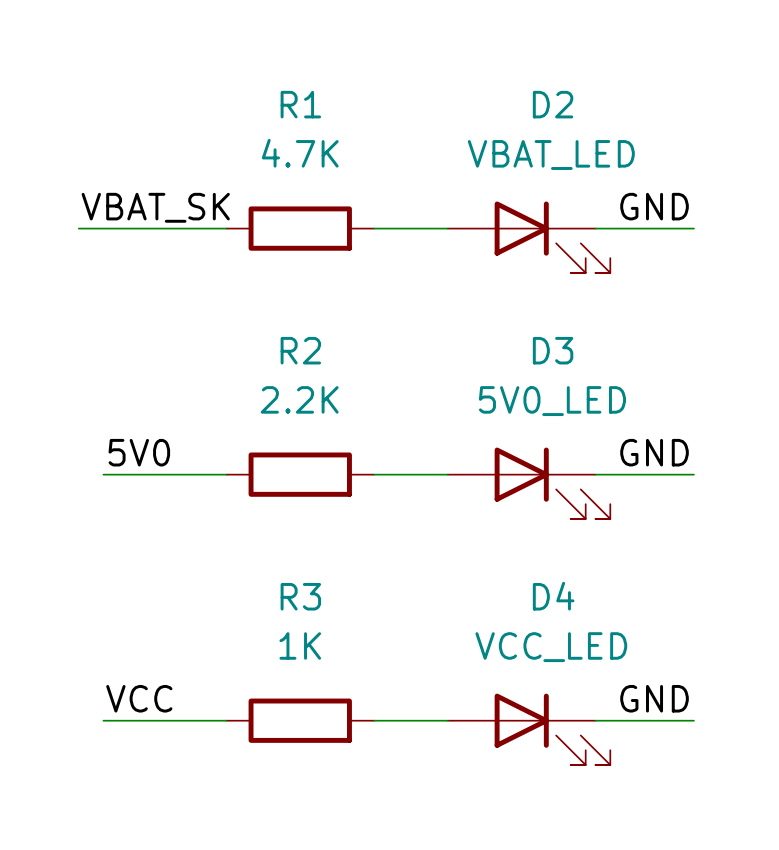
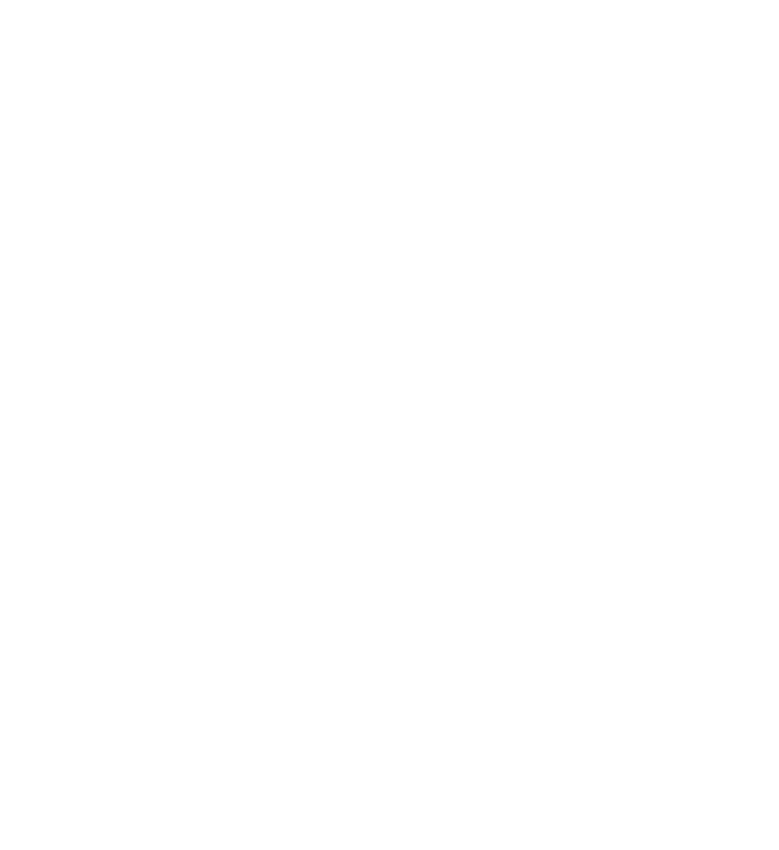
label: GND (654, 206) -> none
label: VBAT_SK (155, 207) -> none
wire: (78, 228) (226, 228) -> none
R1: 4.7K (300, 228) -> none
wire: (374, 228) (447, 228) -> none
wire: (595, 228) (693, 228) -> none
D2: VBAT_LED (529, 237) -> none
label: 5V0 (139, 452) -> none
label: GND (654, 452) -> none
wire: (103, 474) (226, 474) -> none
R2: 2.2K (300, 474) -> none
wire: (374, 474) (447, 474) -> none
wire: (595, 474) (693, 474) -> none
D3: 5V0_LED (529, 483) -> none
label: VCC (139, 698) -> none
label: GND (654, 698) -> none
wire: (103, 720) (226, 720) -> none
R3: 1K (300, 720) -> none
wire: (374, 720) (447, 720) -> none
wire: (595, 720) (693, 720) -> none
D4: VCC_LED (529, 729) -> none

